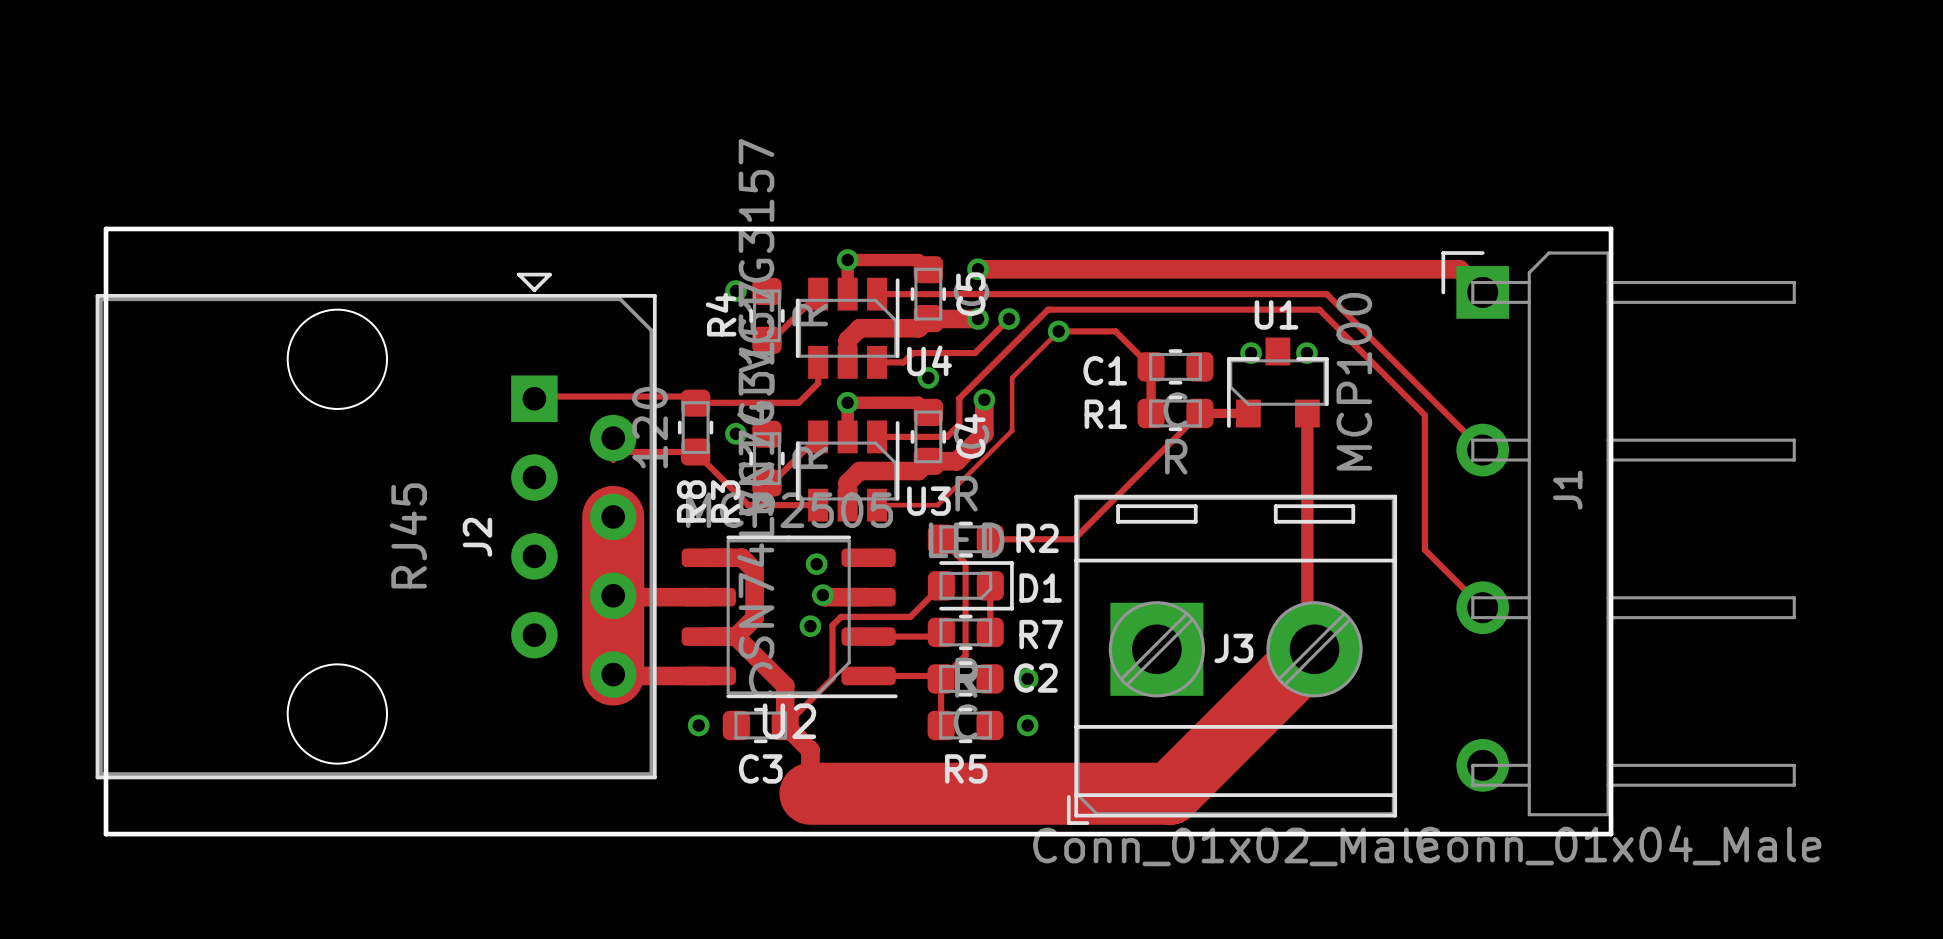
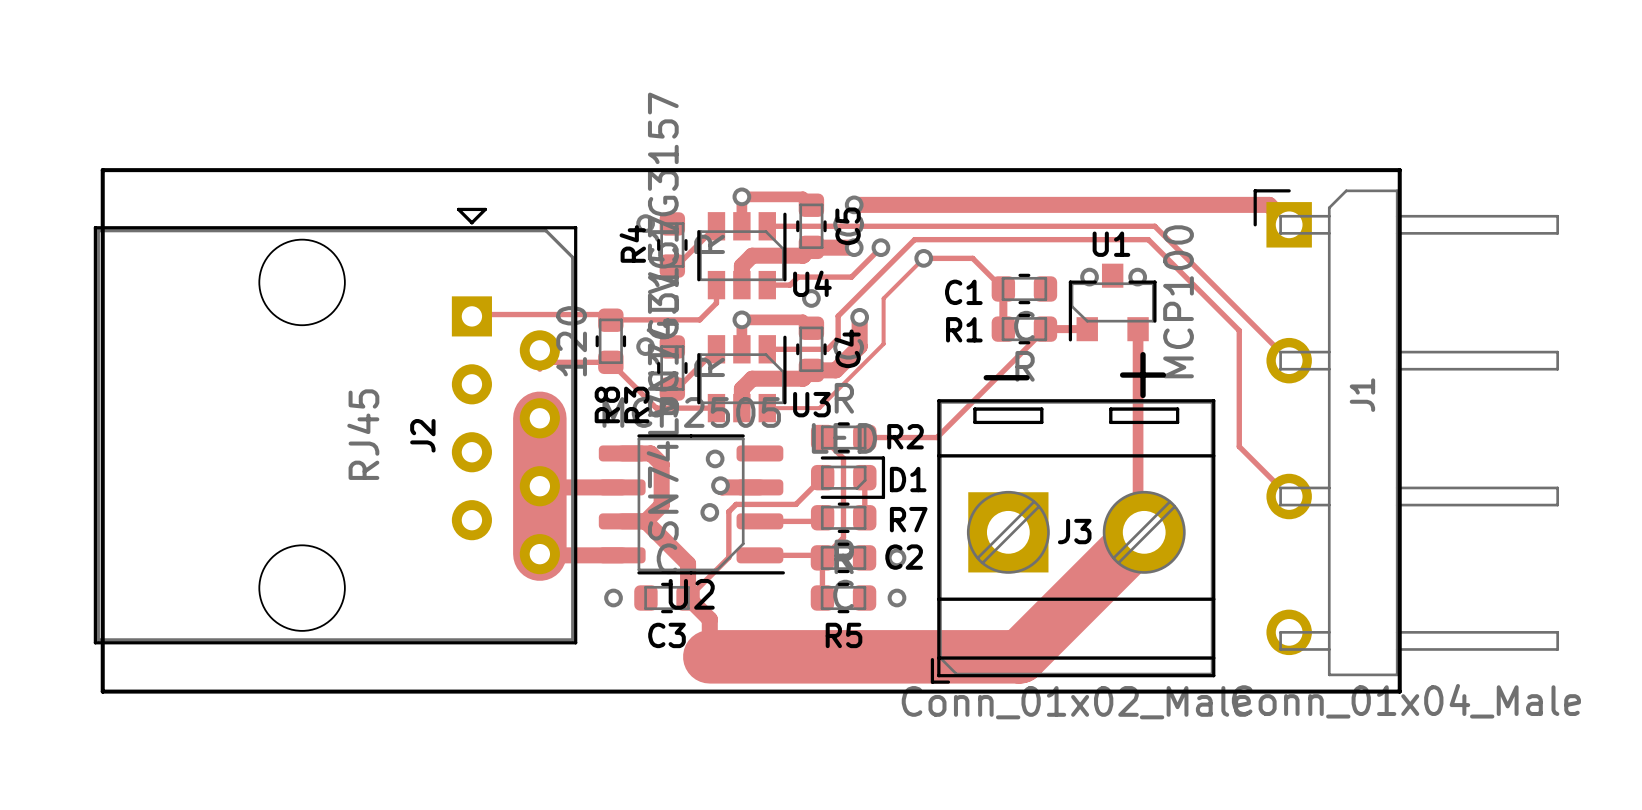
text: none -> + (1143, 375)
text: none -> - (1006, 377)

